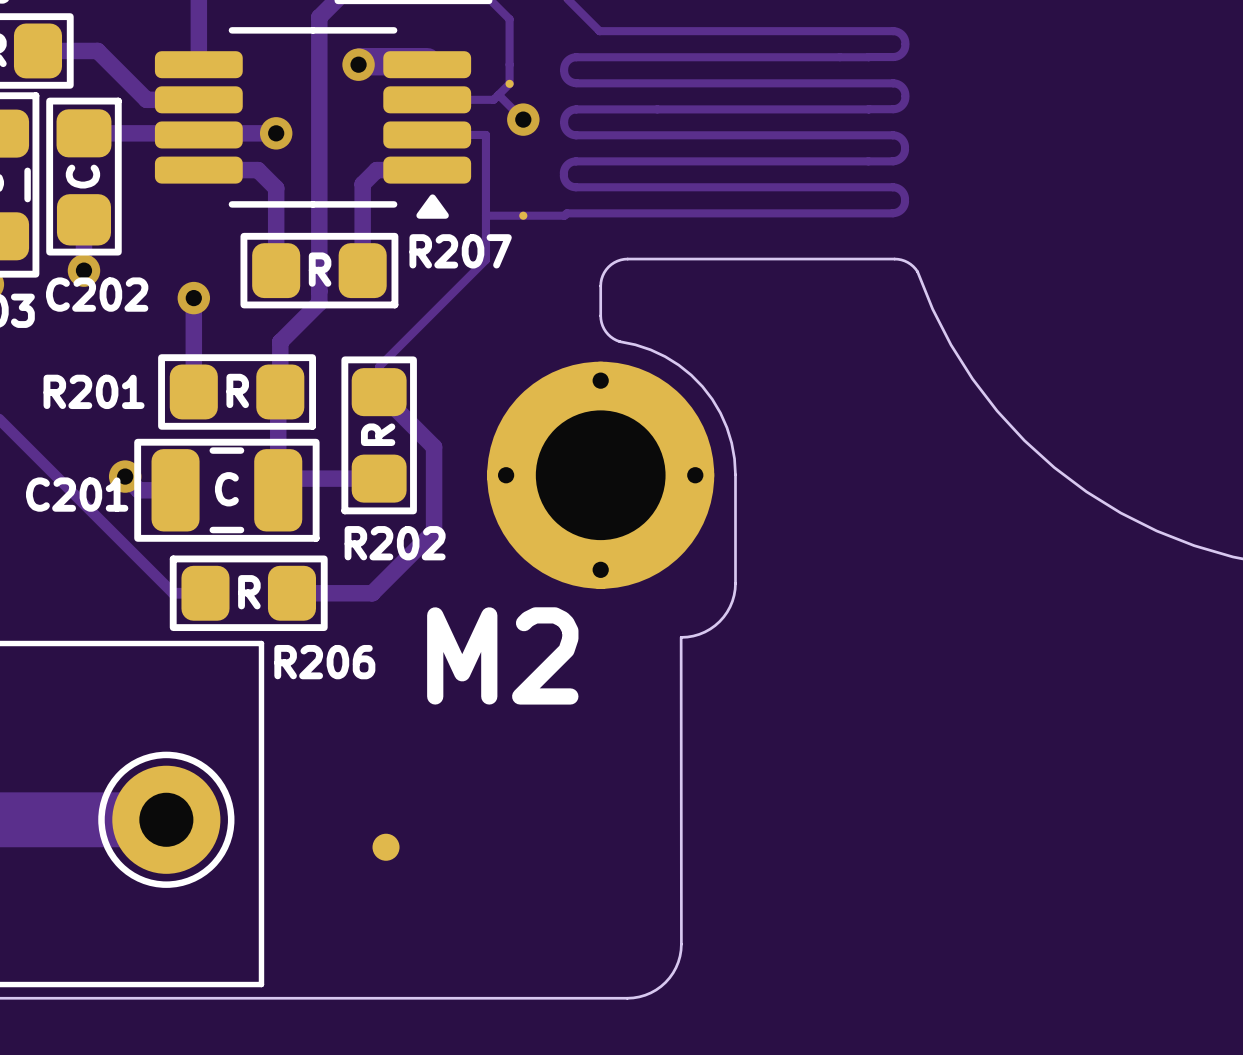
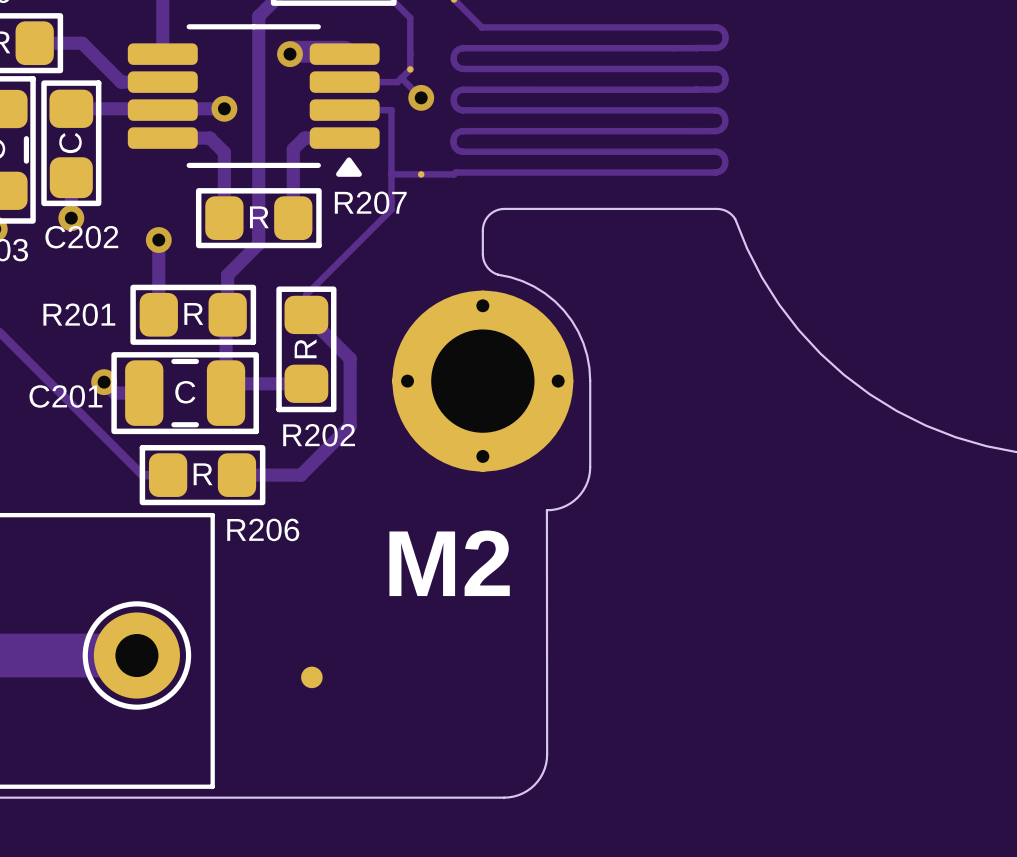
text position: M2 (502, 655) -> M2 (449, 563)

